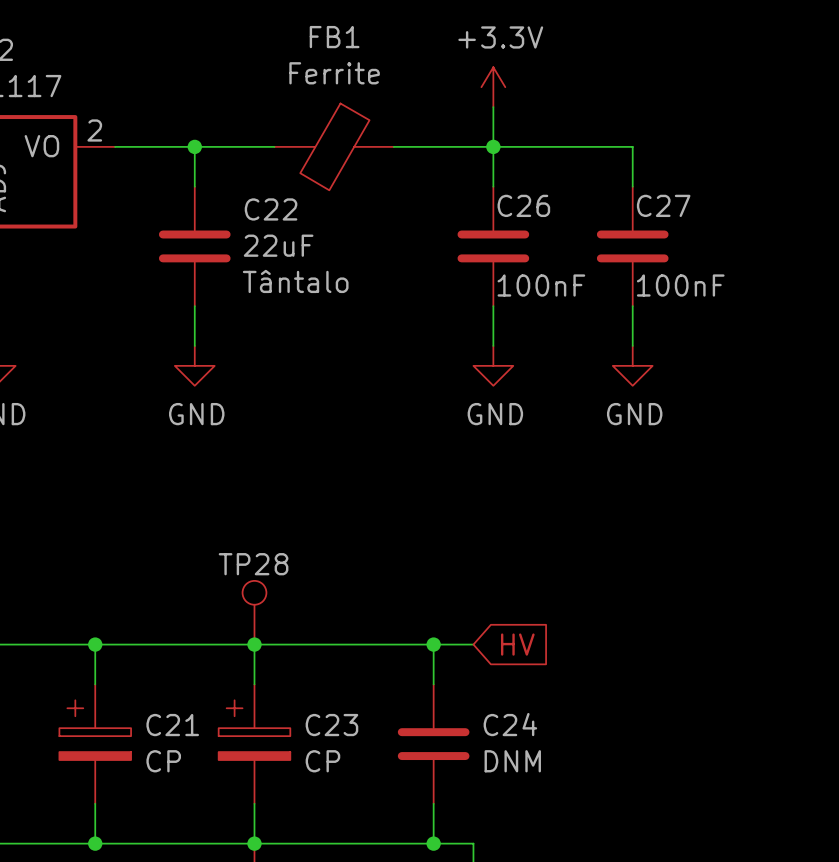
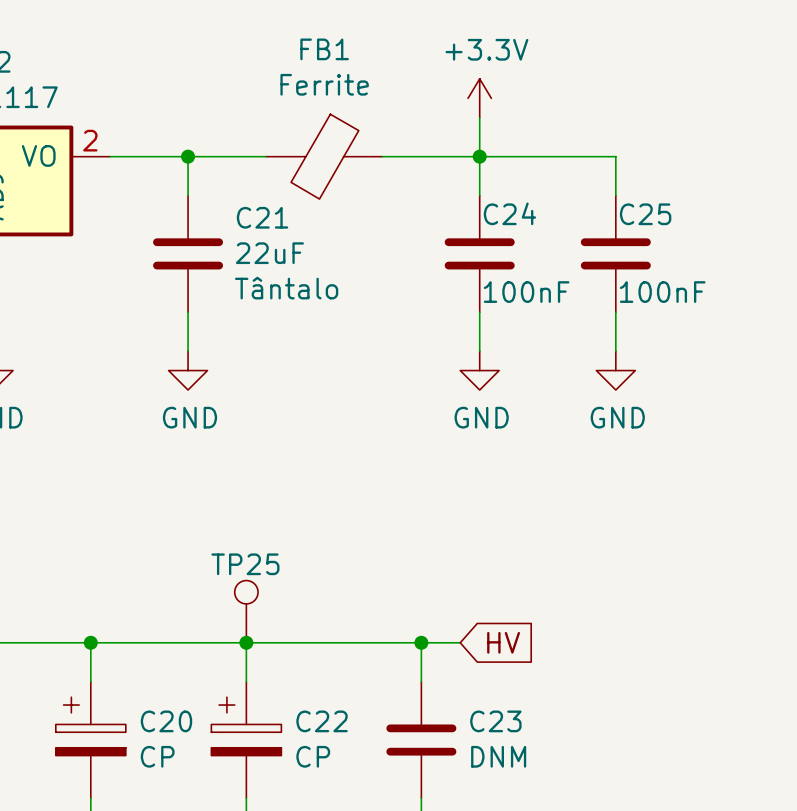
C26 name: C26 (523, 205) -> C24 (509, 213)
C27 name: C27 (663, 205) -> C25 (645, 214)
C22 name: C22 (271, 209) -> C21 (262, 217)
TP28 name: TP28 (253, 564) -> TP25 (245, 564)
C24 name: C24 (510, 724) -> C23 (495, 721)
C21 name: C21 (172, 725) -> C20 (166, 721)
C23 name: C23 (331, 725) -> C22 (322, 721)

